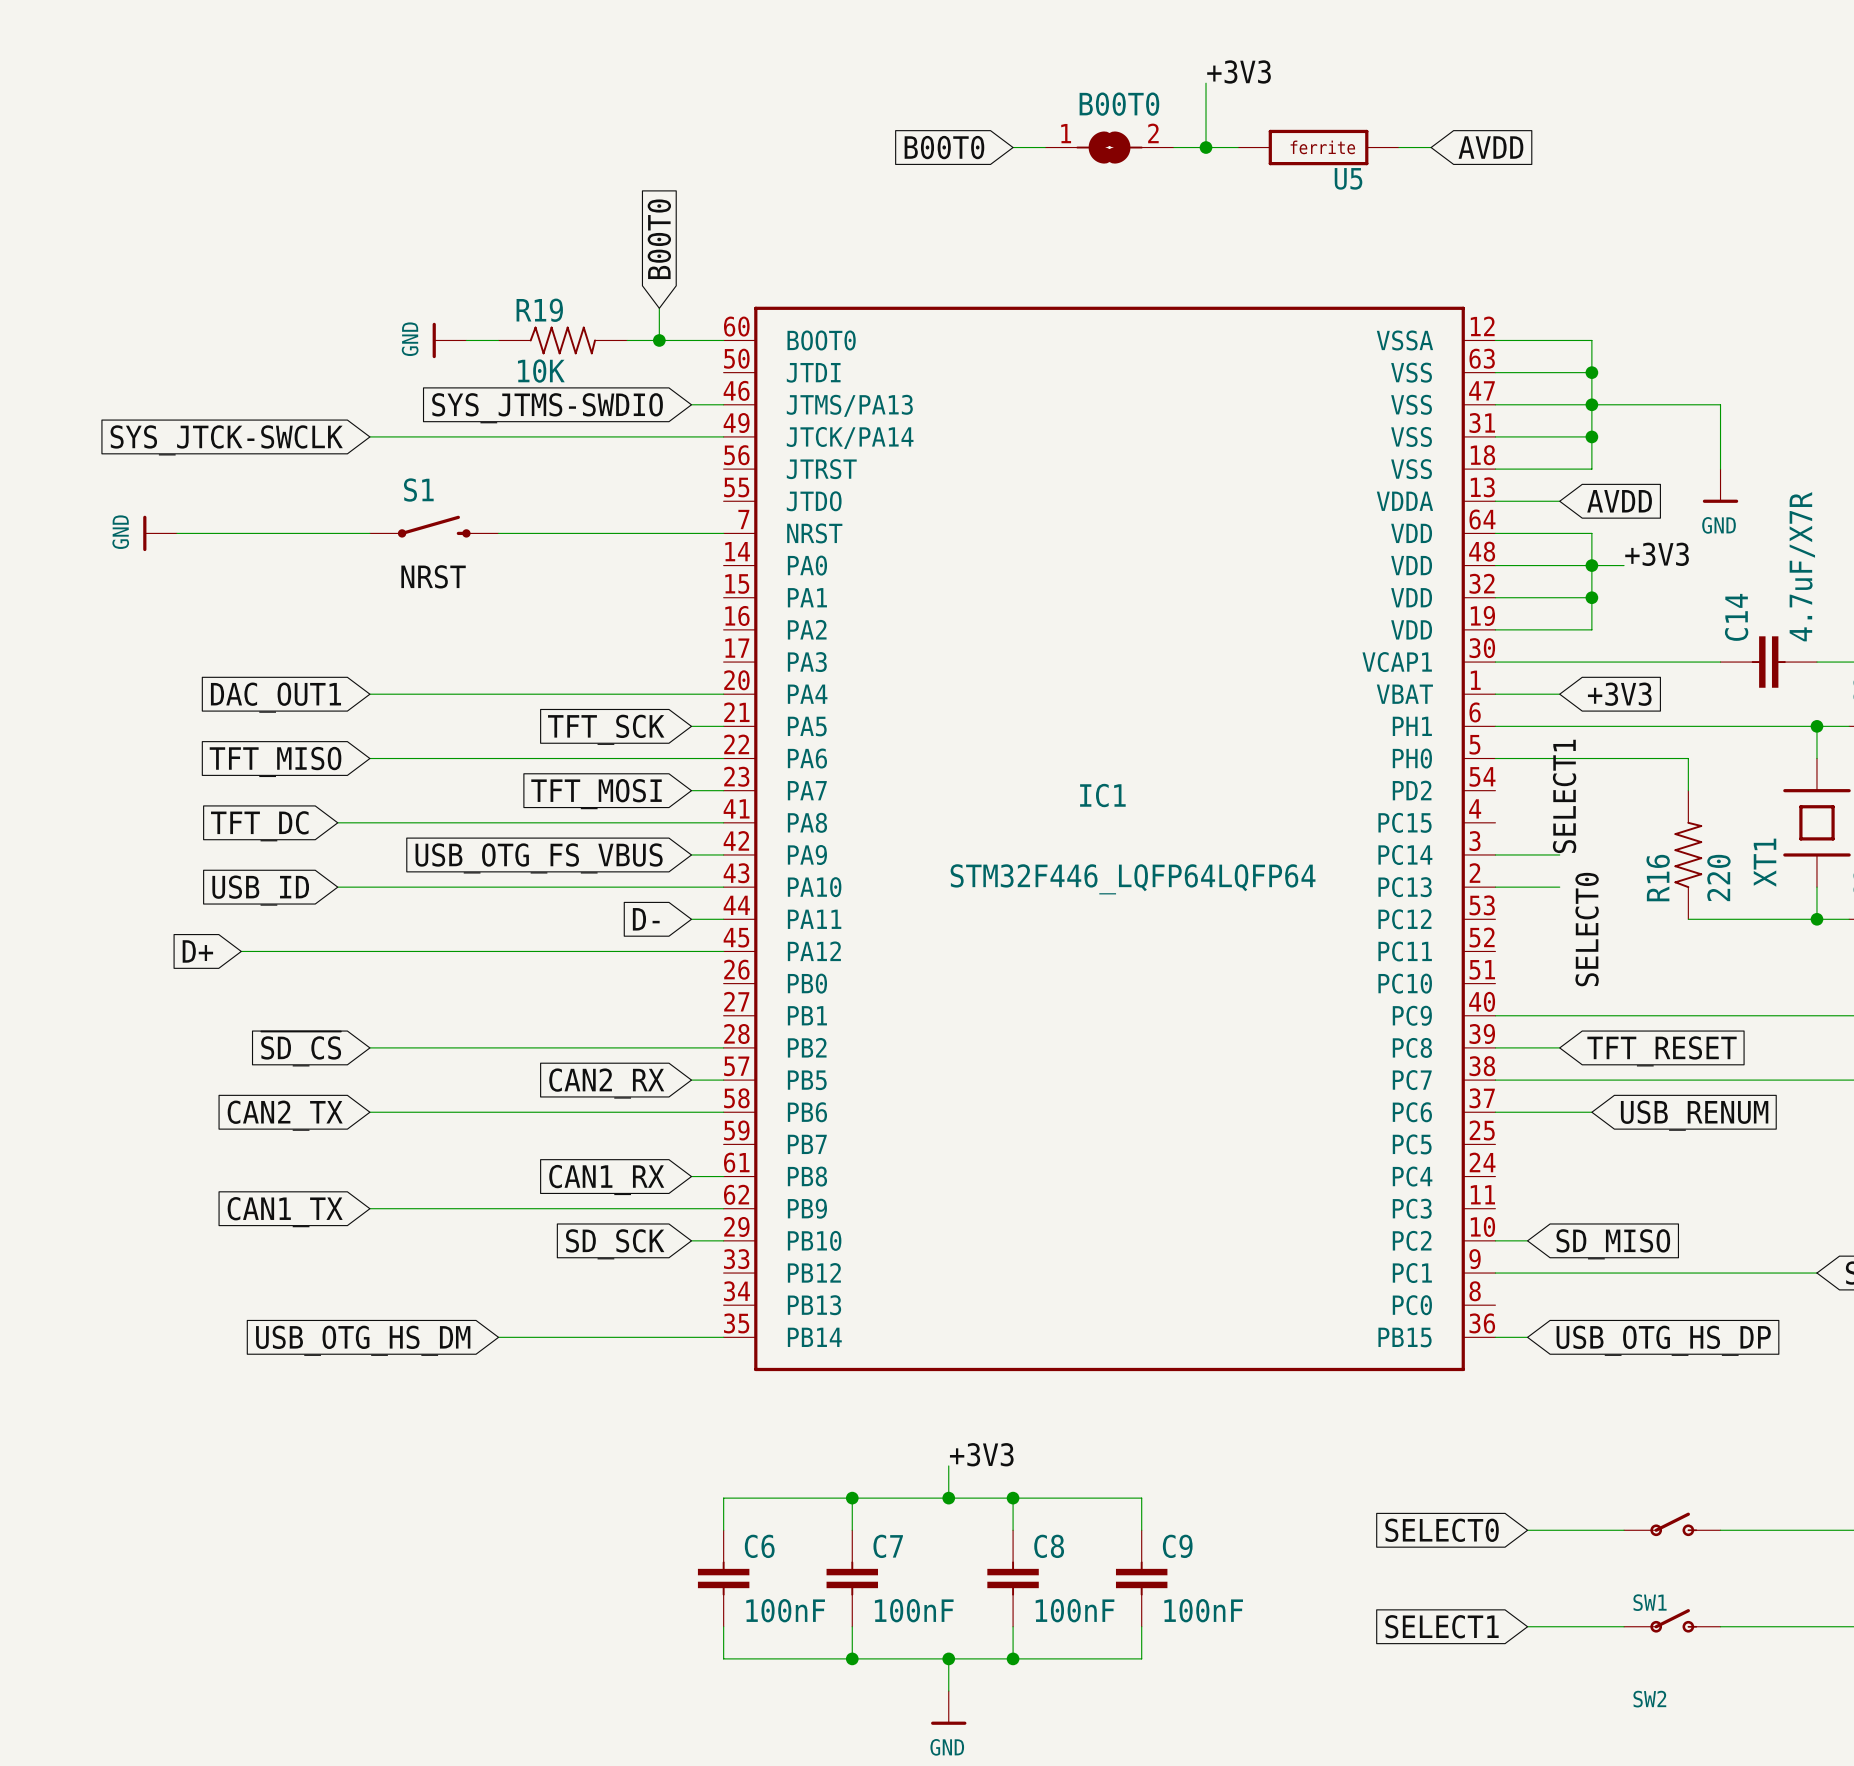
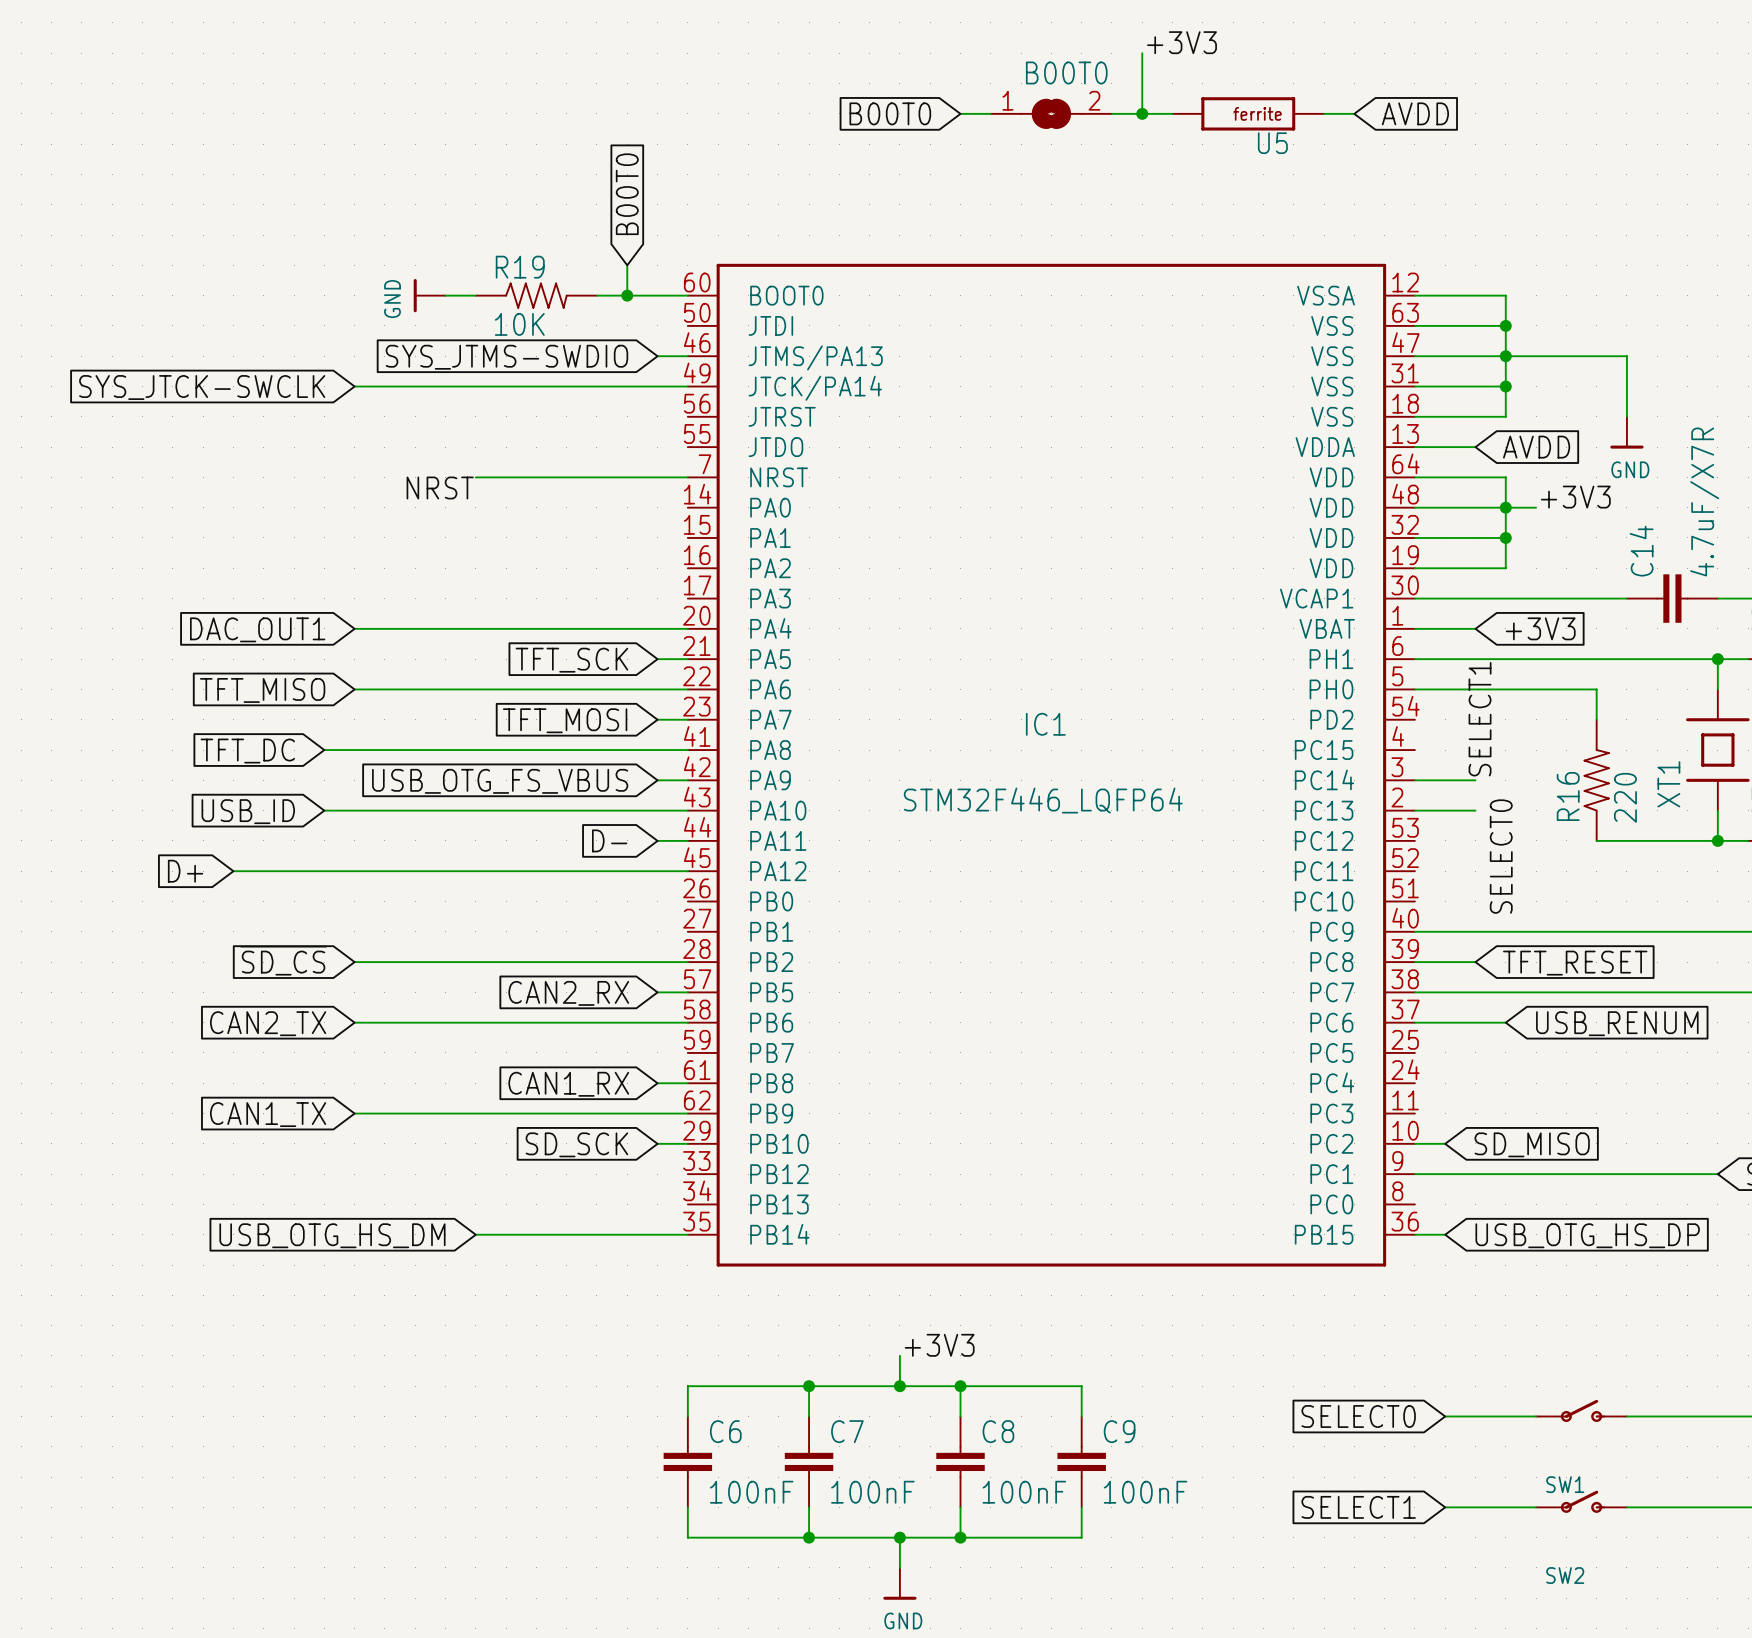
S1: (434, 526) -> none
power symbol: GND (160, 533) -> none
wire: (176, 533) (369, 533) -> none
label position: NRST (433, 576) -> NRST (440, 487)
IC1 value: STM32F446_LQFP64LQFP64 (1133, 879) -> STM32F446_LQFP64 (1043, 800)

